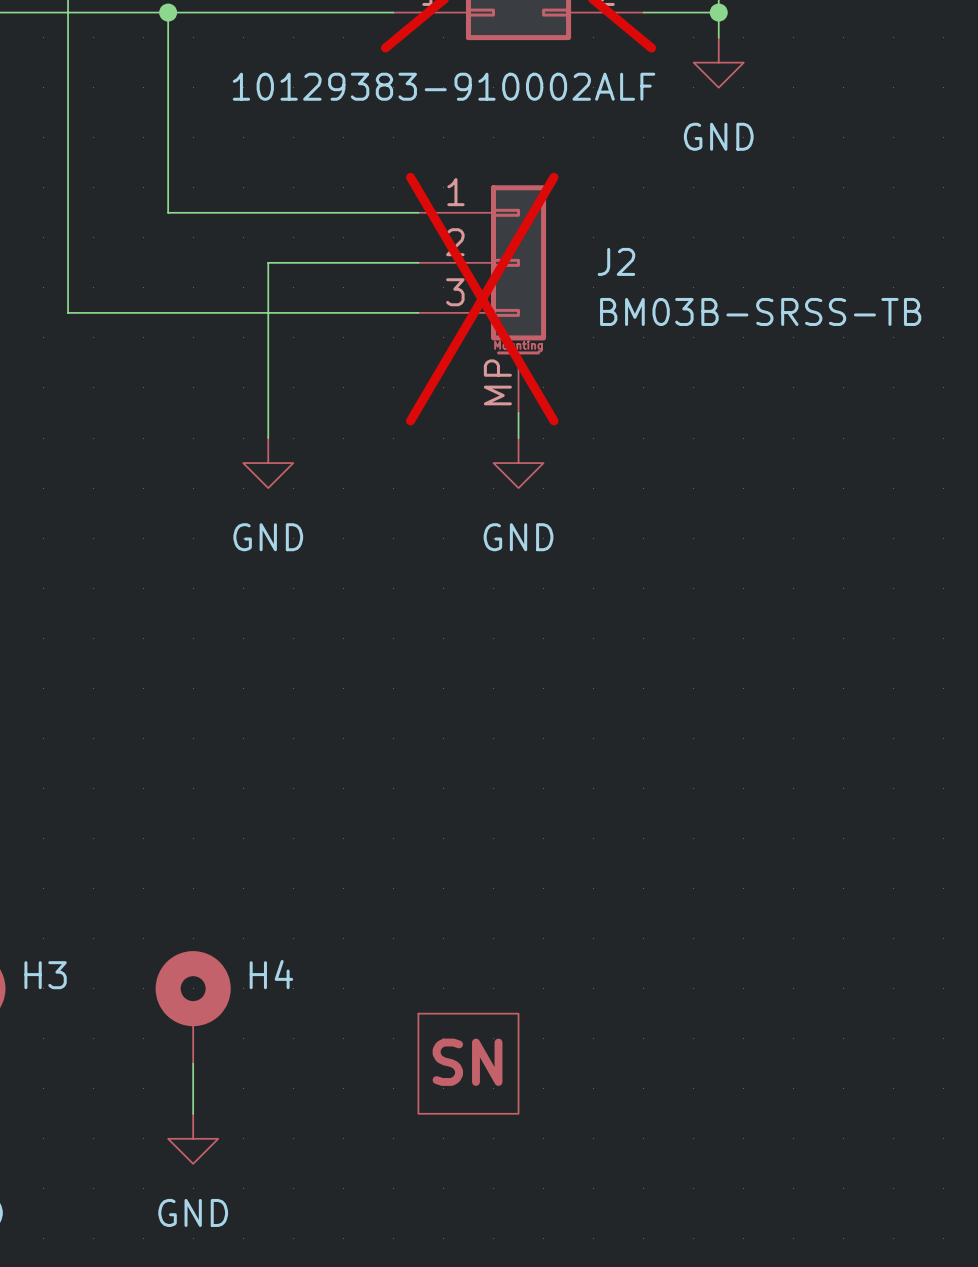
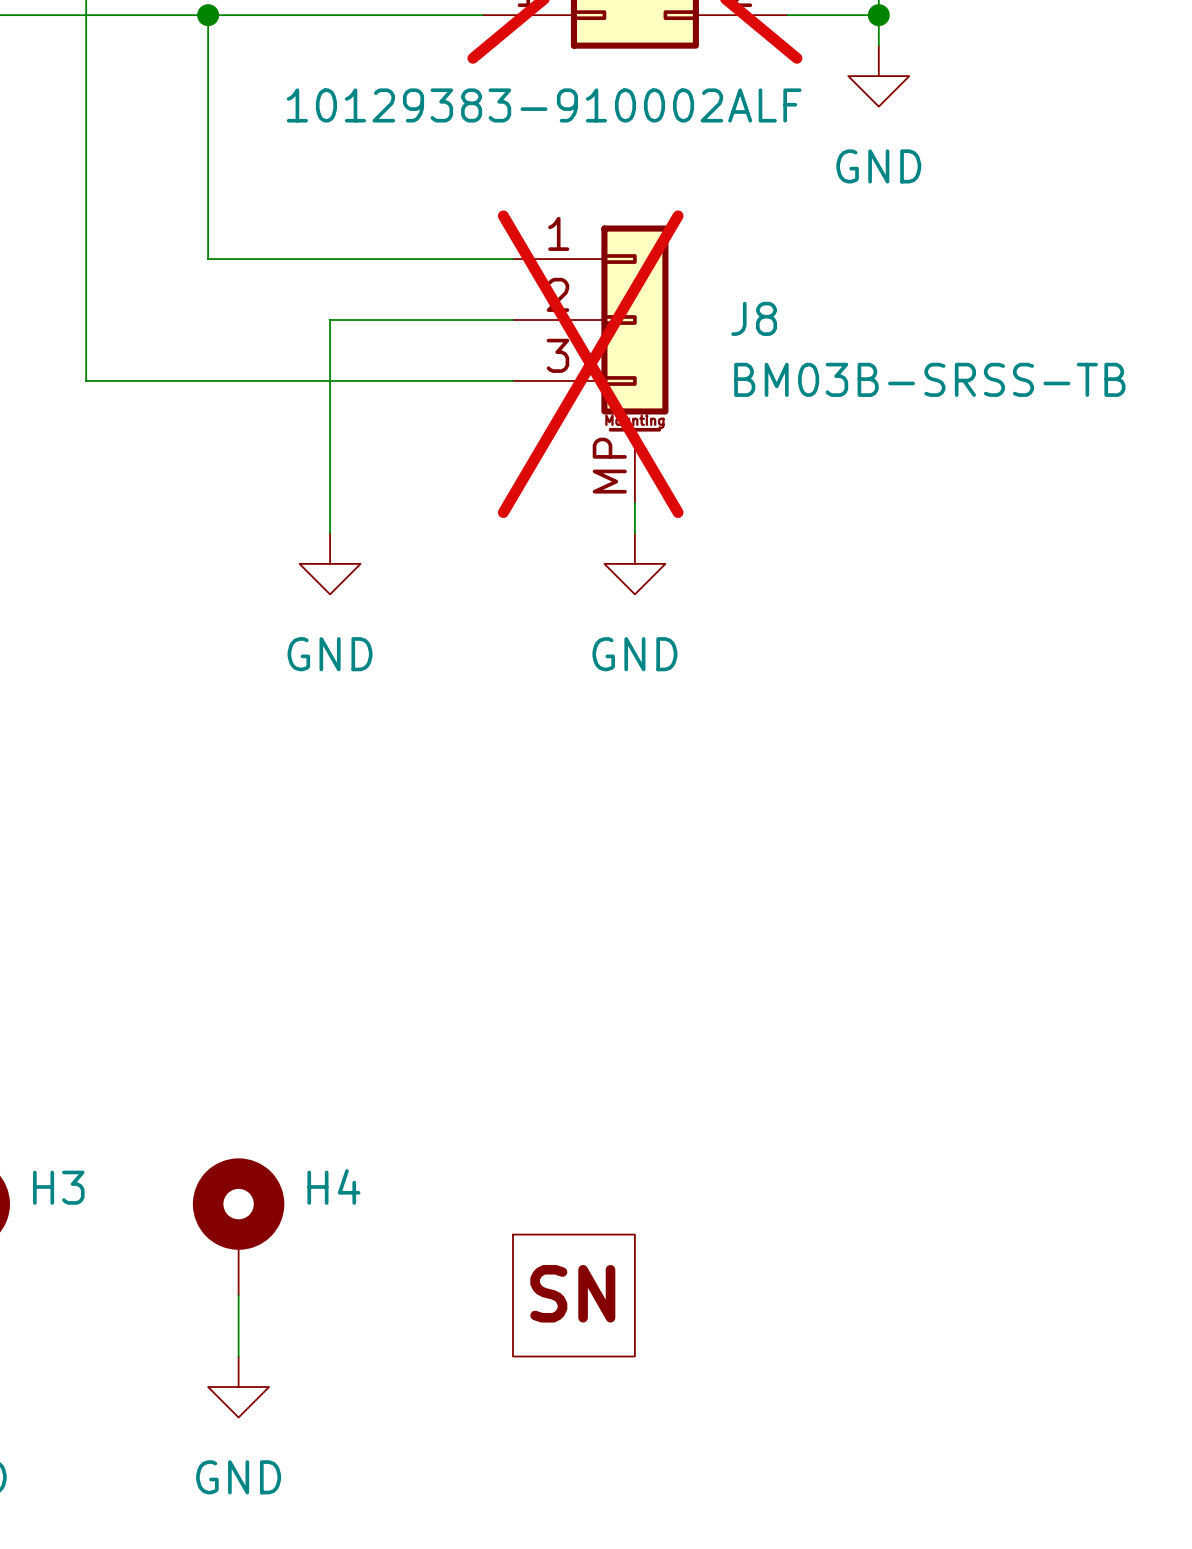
J2 name: J2 (616, 261) -> J8 (754, 318)

